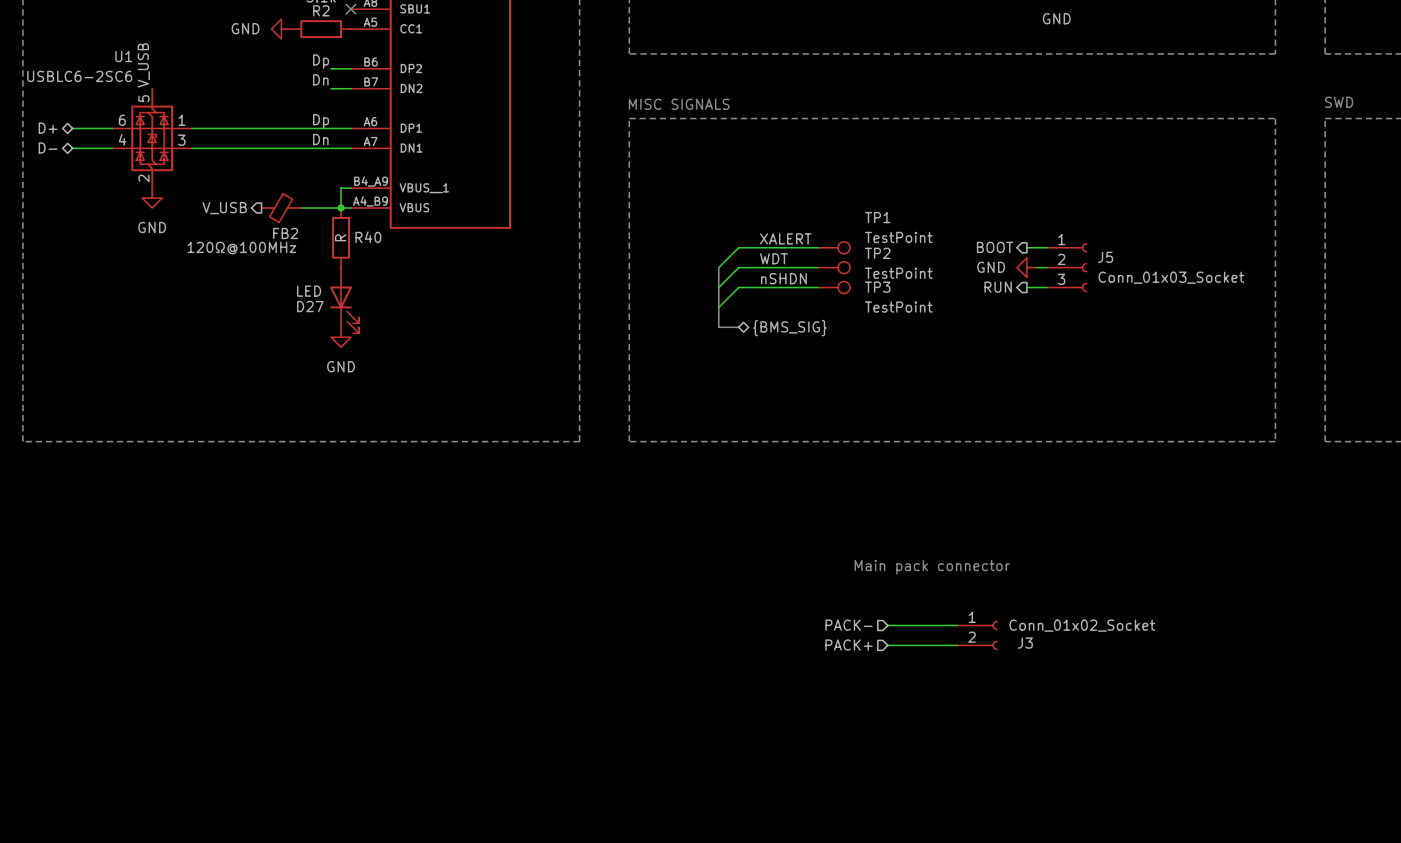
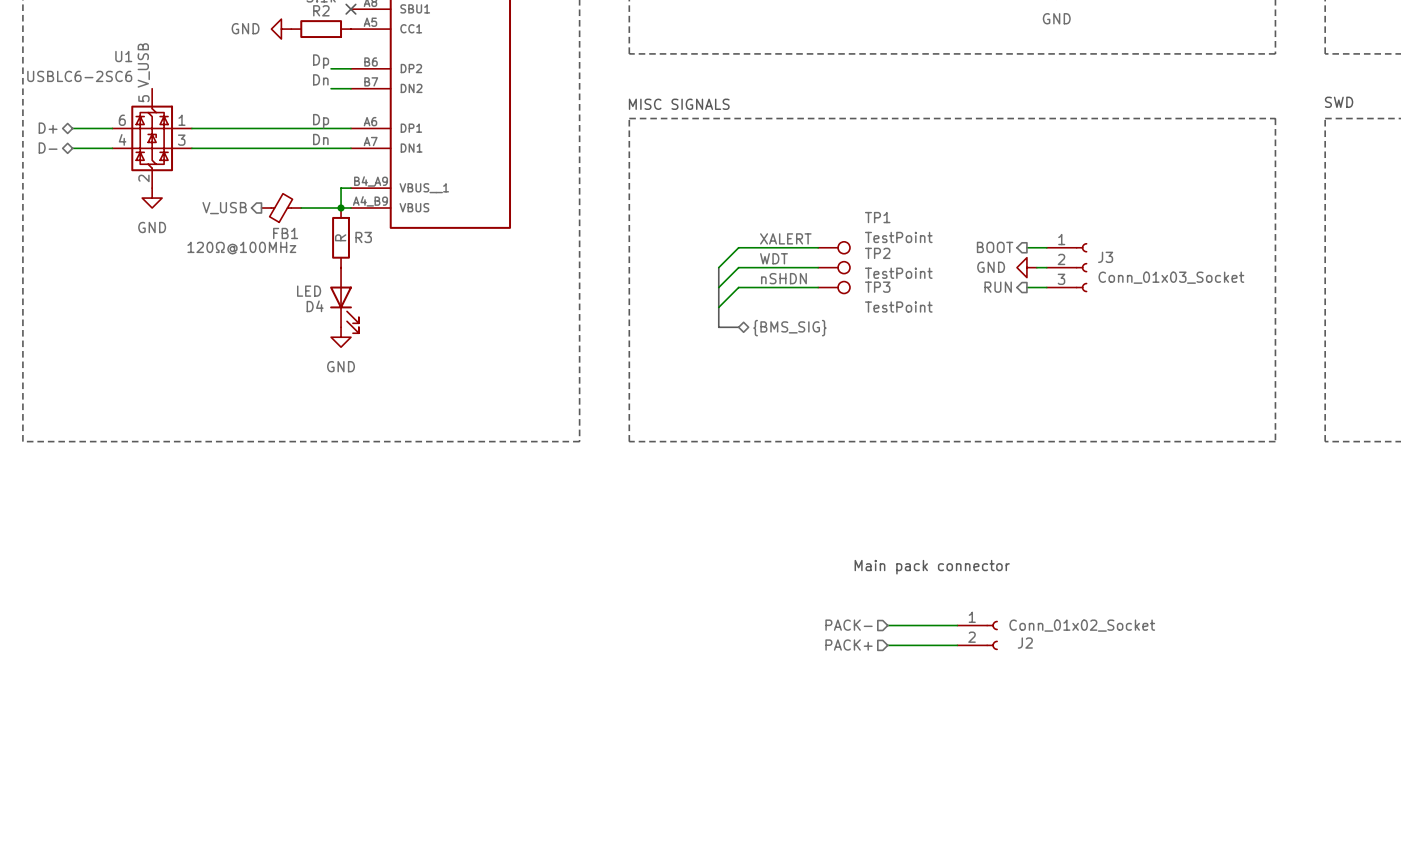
FB2 name: FB2 (285, 233) -> FB1 (285, 233)
R40 name: R40 (368, 237) -> R3 (363, 237)
J5 name: J5 (1105, 257) -> J3 (1105, 257)
D27 name: D27 (310, 306) -> D4 (315, 306)
J3 name: J3 (1025, 643) -> J2 (1025, 643)

